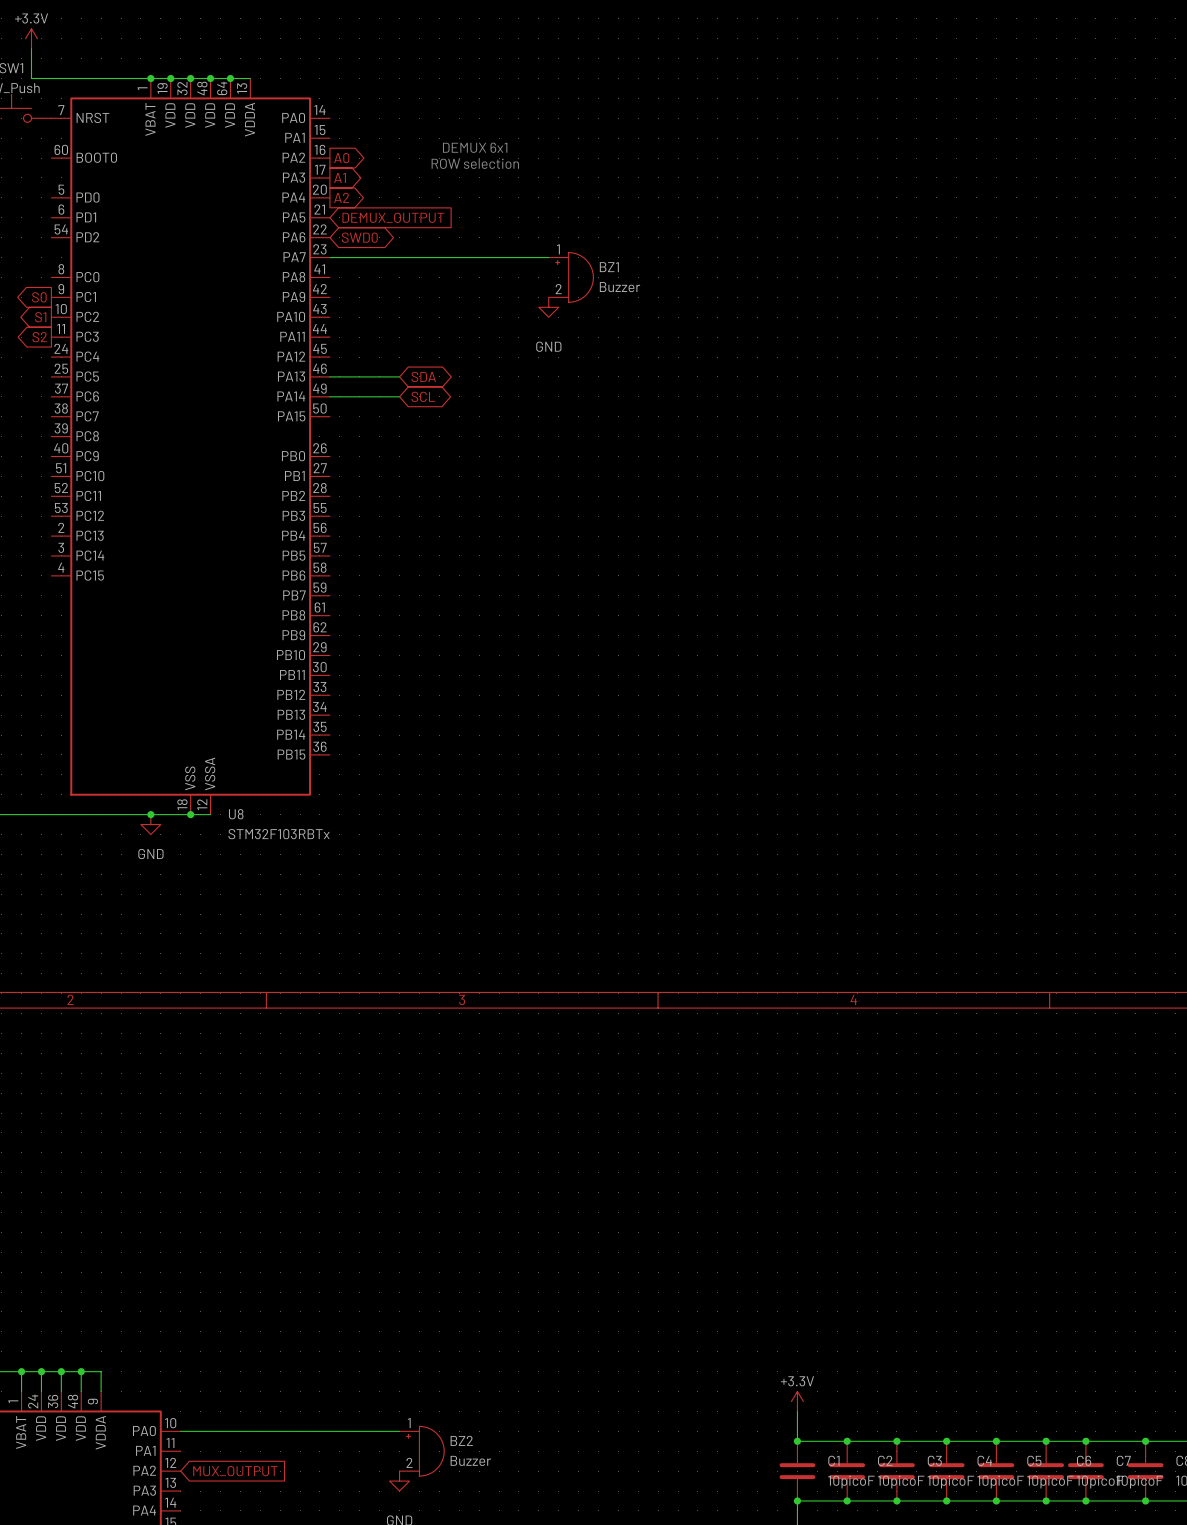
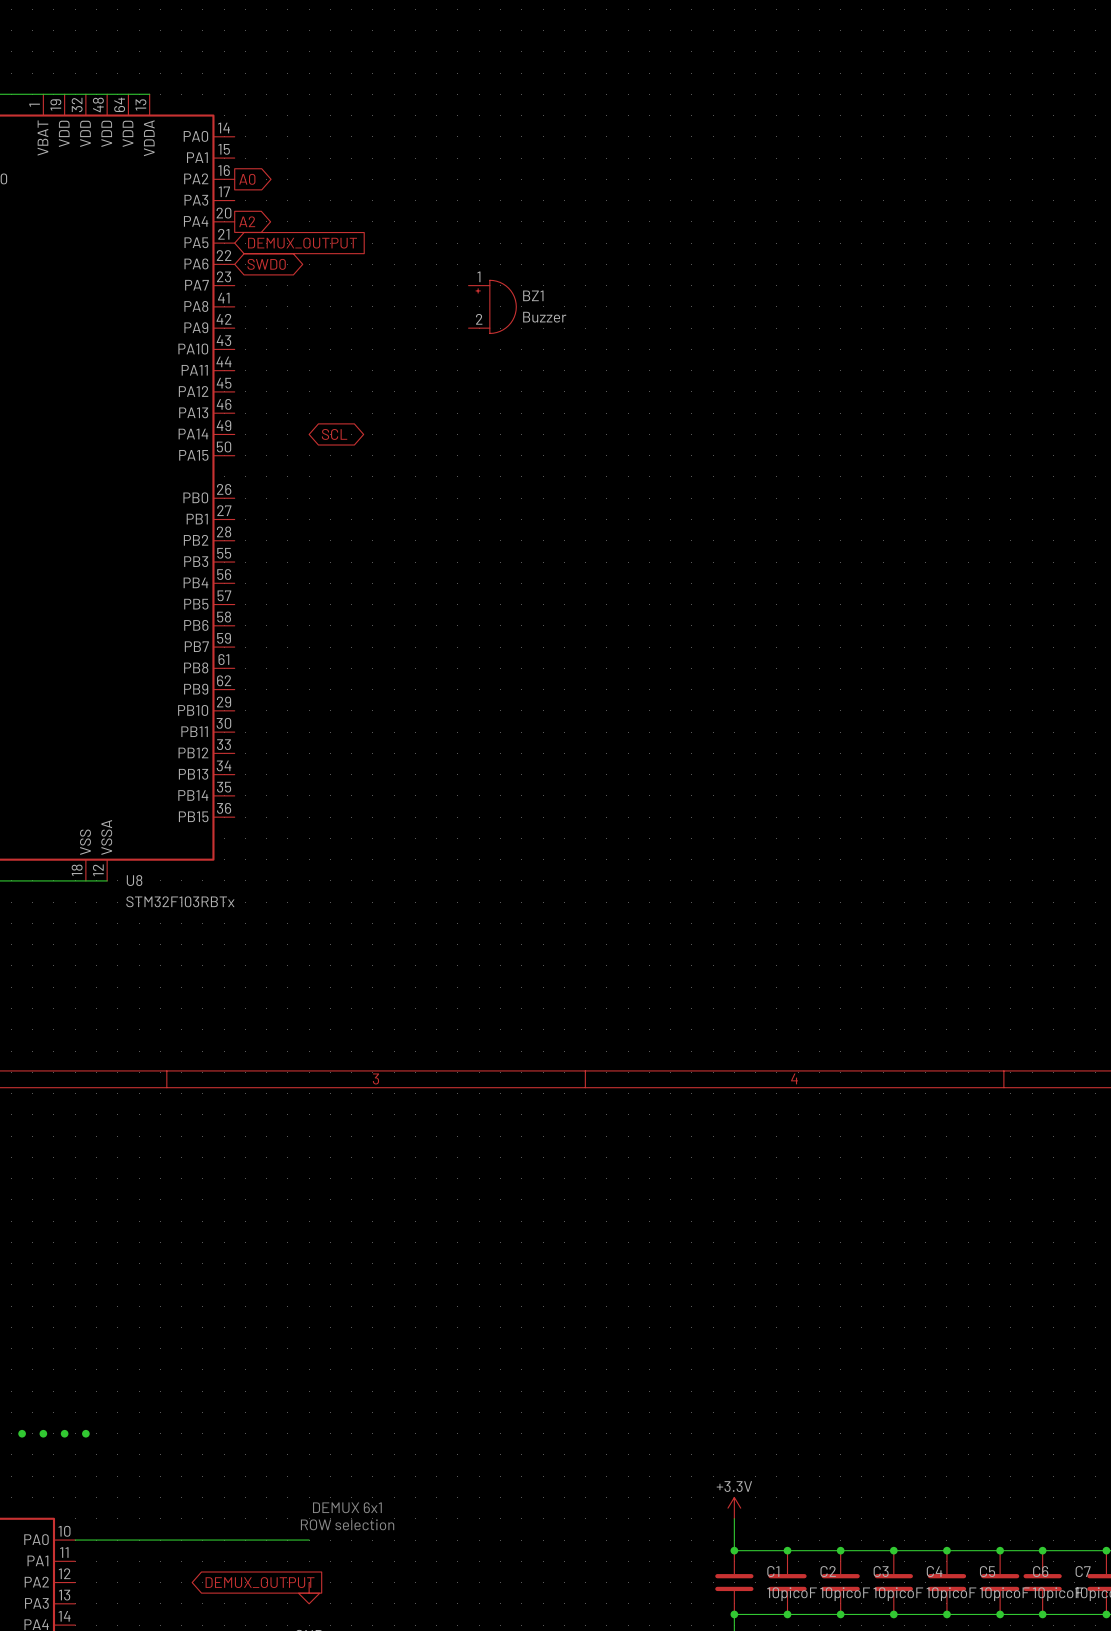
junction: (150, 78) -> none
junction: (170, 78) -> none
junction: (190, 78) -> none
junction: (210, 78) -> none
junction: (230, 78) -> none
text: DEMUX 6x1 (475, 147) -> none
text: ROW selection (475, 163) -> none
global label: A1 (340, 177) -> none
wire: (329, 257) (548, 257) -> none
power symbol: GND (548, 307) -> none
wire: (329, 376) (399, 376) -> none
global label: SDA (423, 376) -> none
wire: (329, 396) (399, 396) -> none
junction: (150, 814) -> none
junction: (190, 814) -> none
power symbol: GND (150, 824) -> none
junction: none -> (22, 1433)
junction: none -> (43, 1433)
junction: none -> (64, 1433)
junction: none -> (85, 1433)
text: none -> DEMUX 6x1 (347, 1507)
text: none -> ROW selection (347, 1524)
BZ2: Buzzer (421, 1451) -> none
global label: MUX_OUTPUT (235, 1471) -> DEMUX_OUTPUT (260, 1582)

